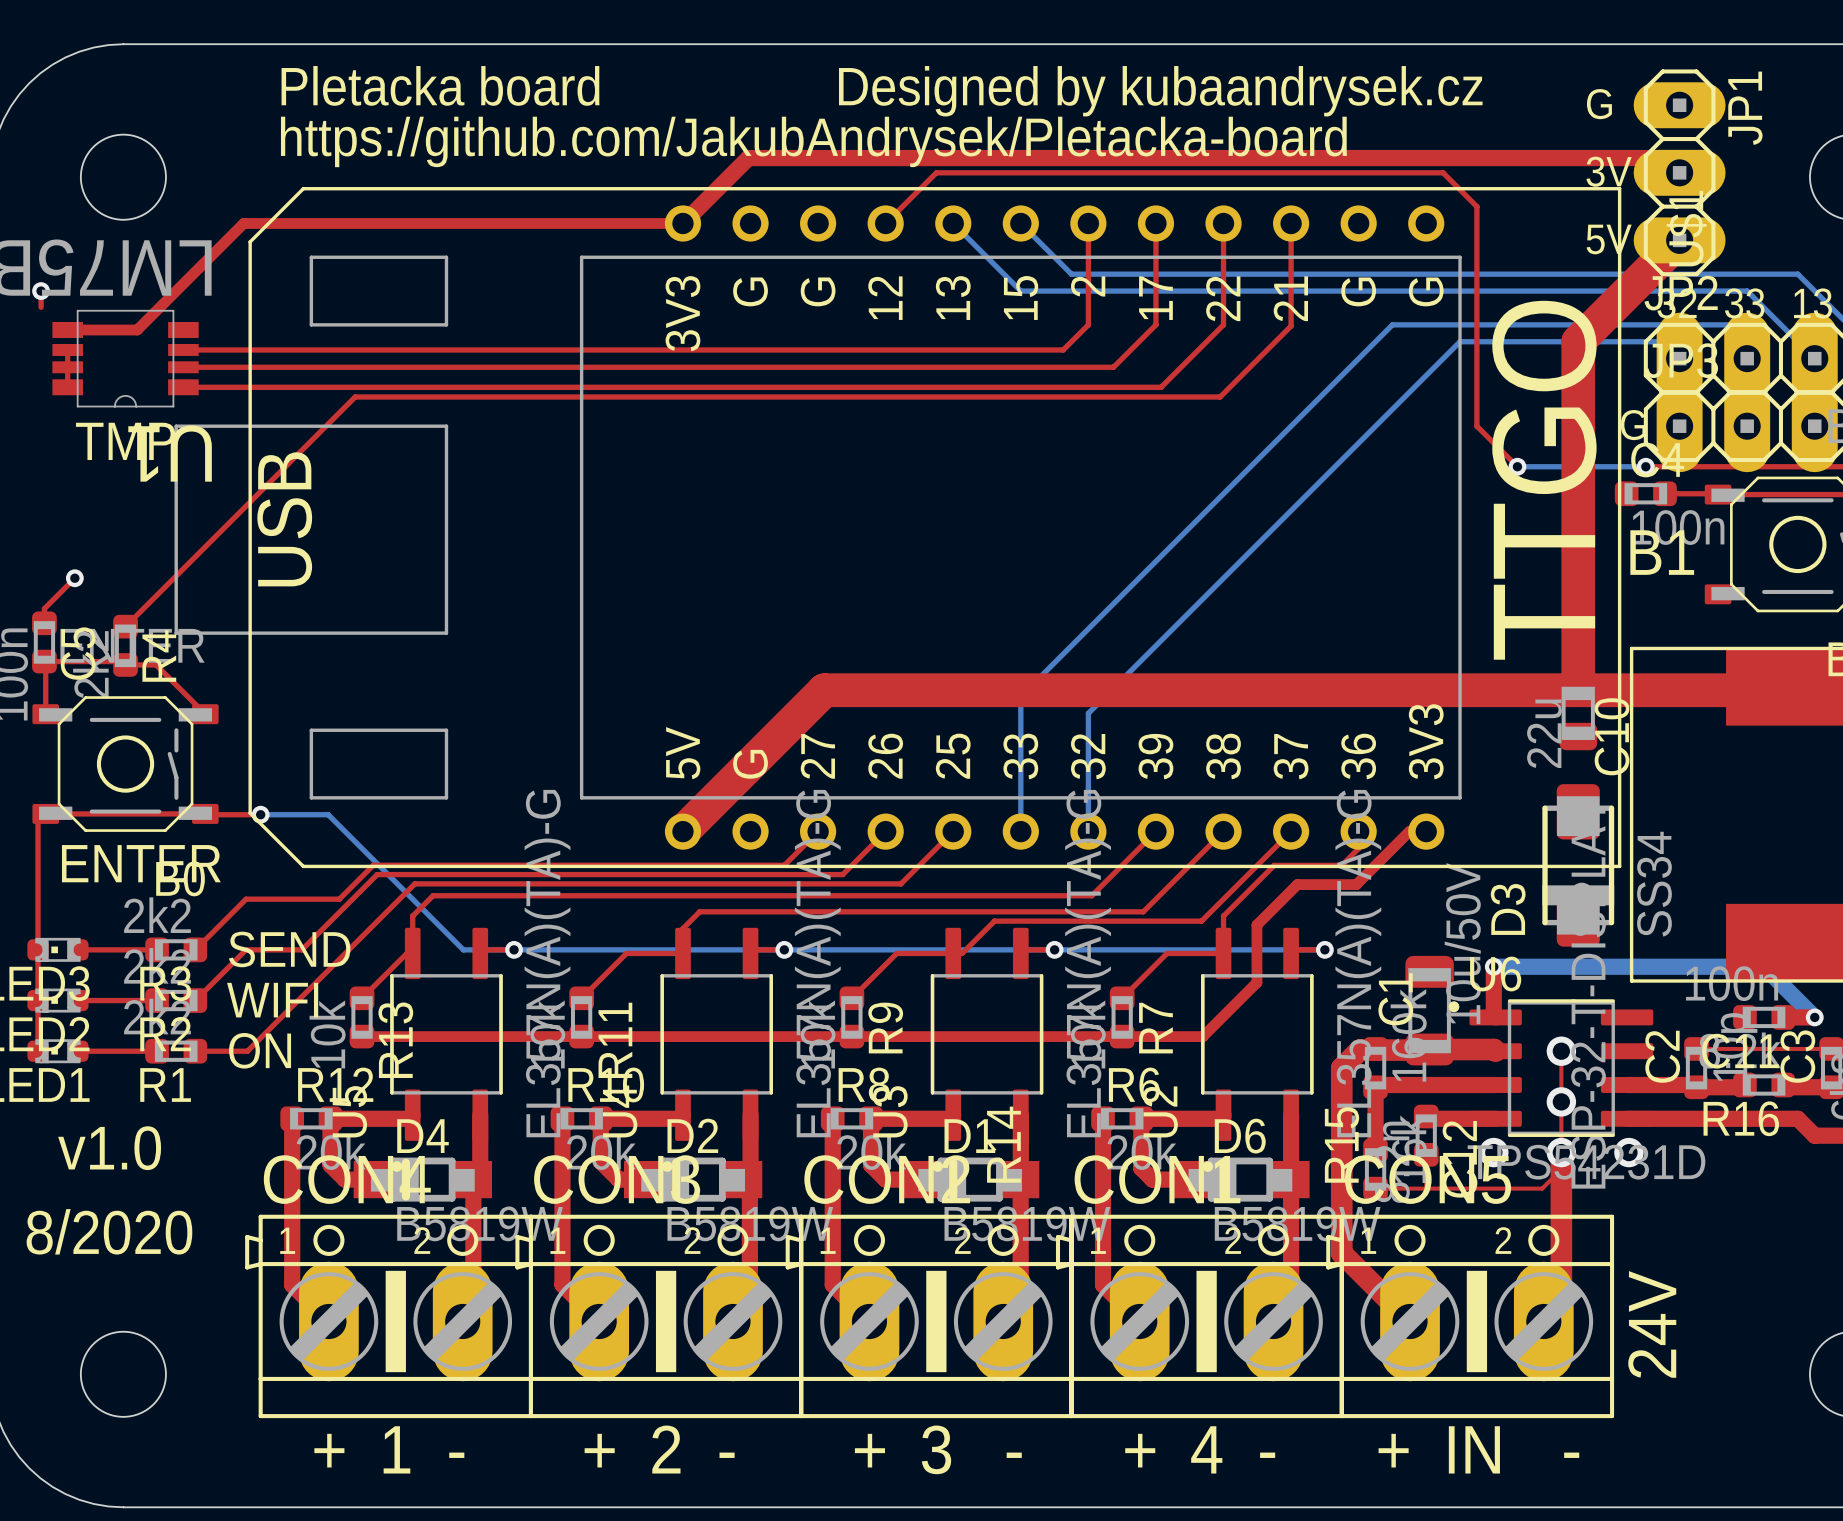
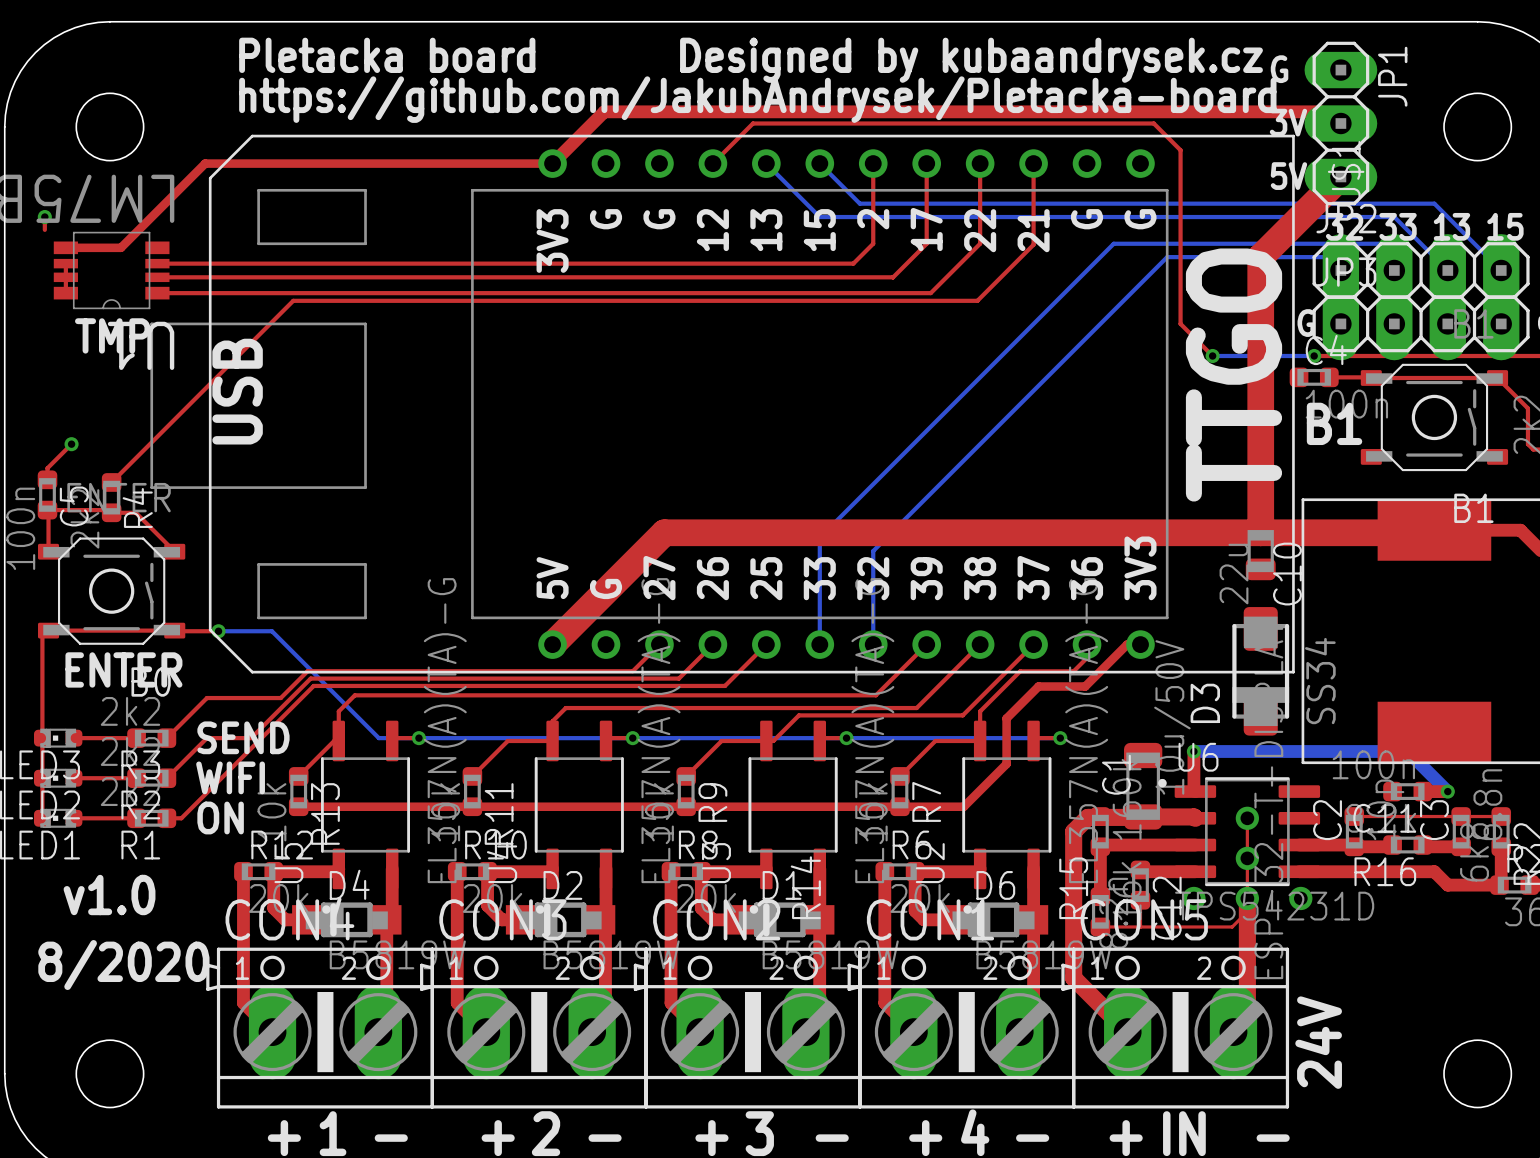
top track: (414, 883) (247, 1051) (213, 1051) -> (340, 685) (313, 685) (181, 818)

